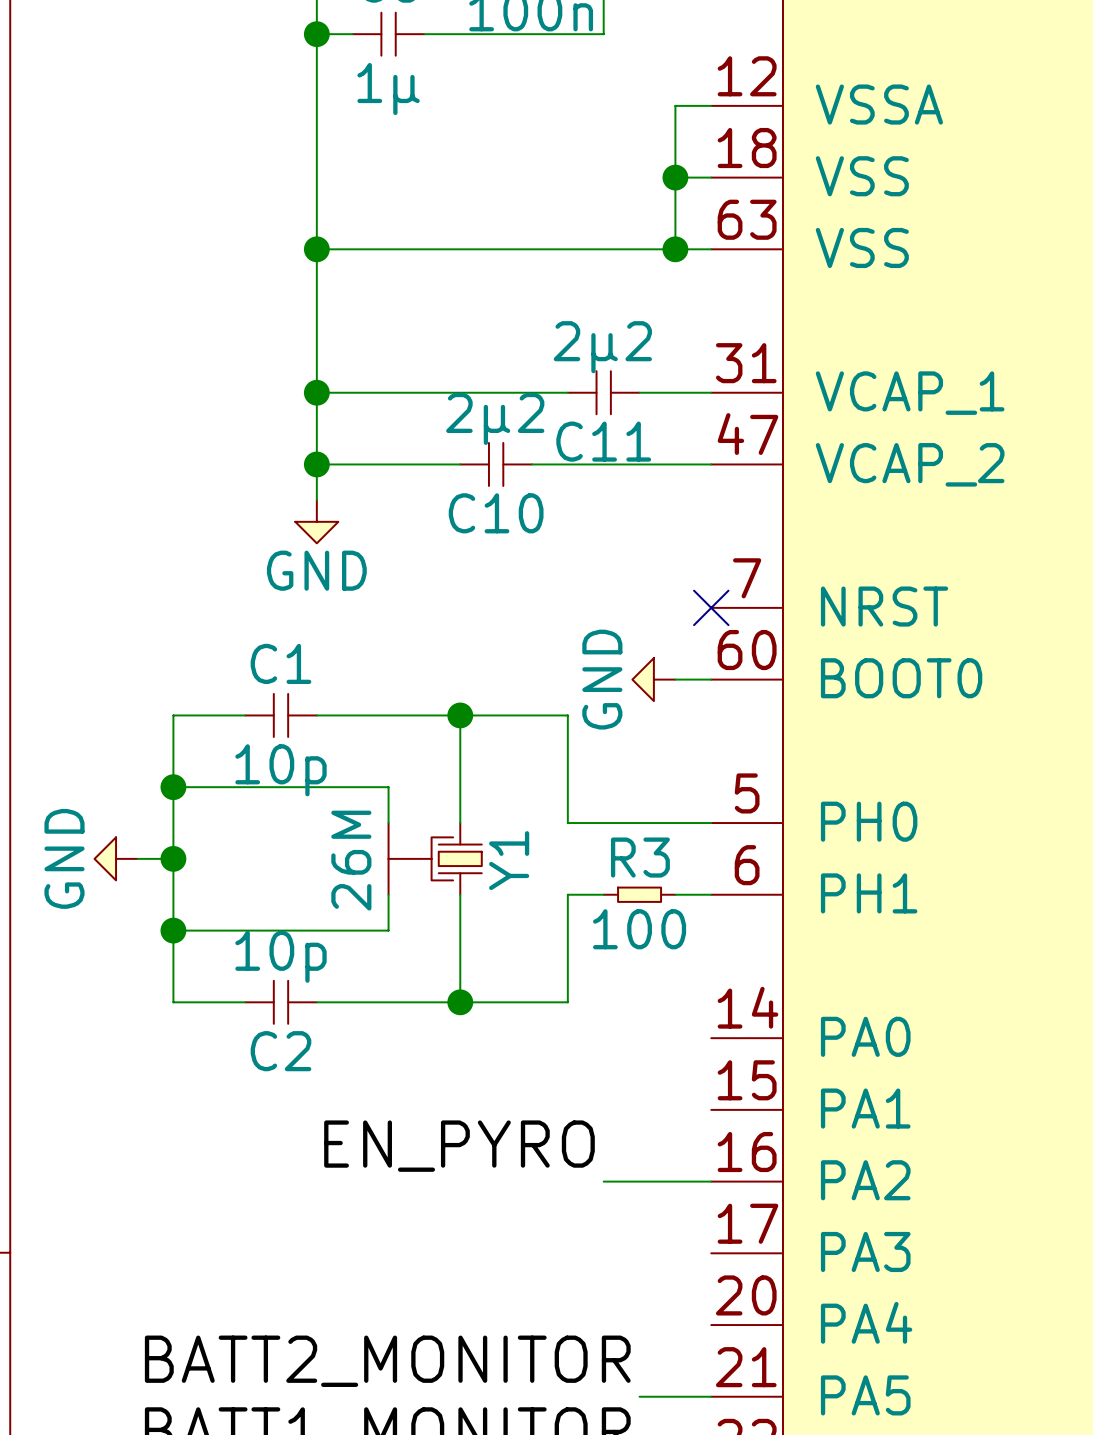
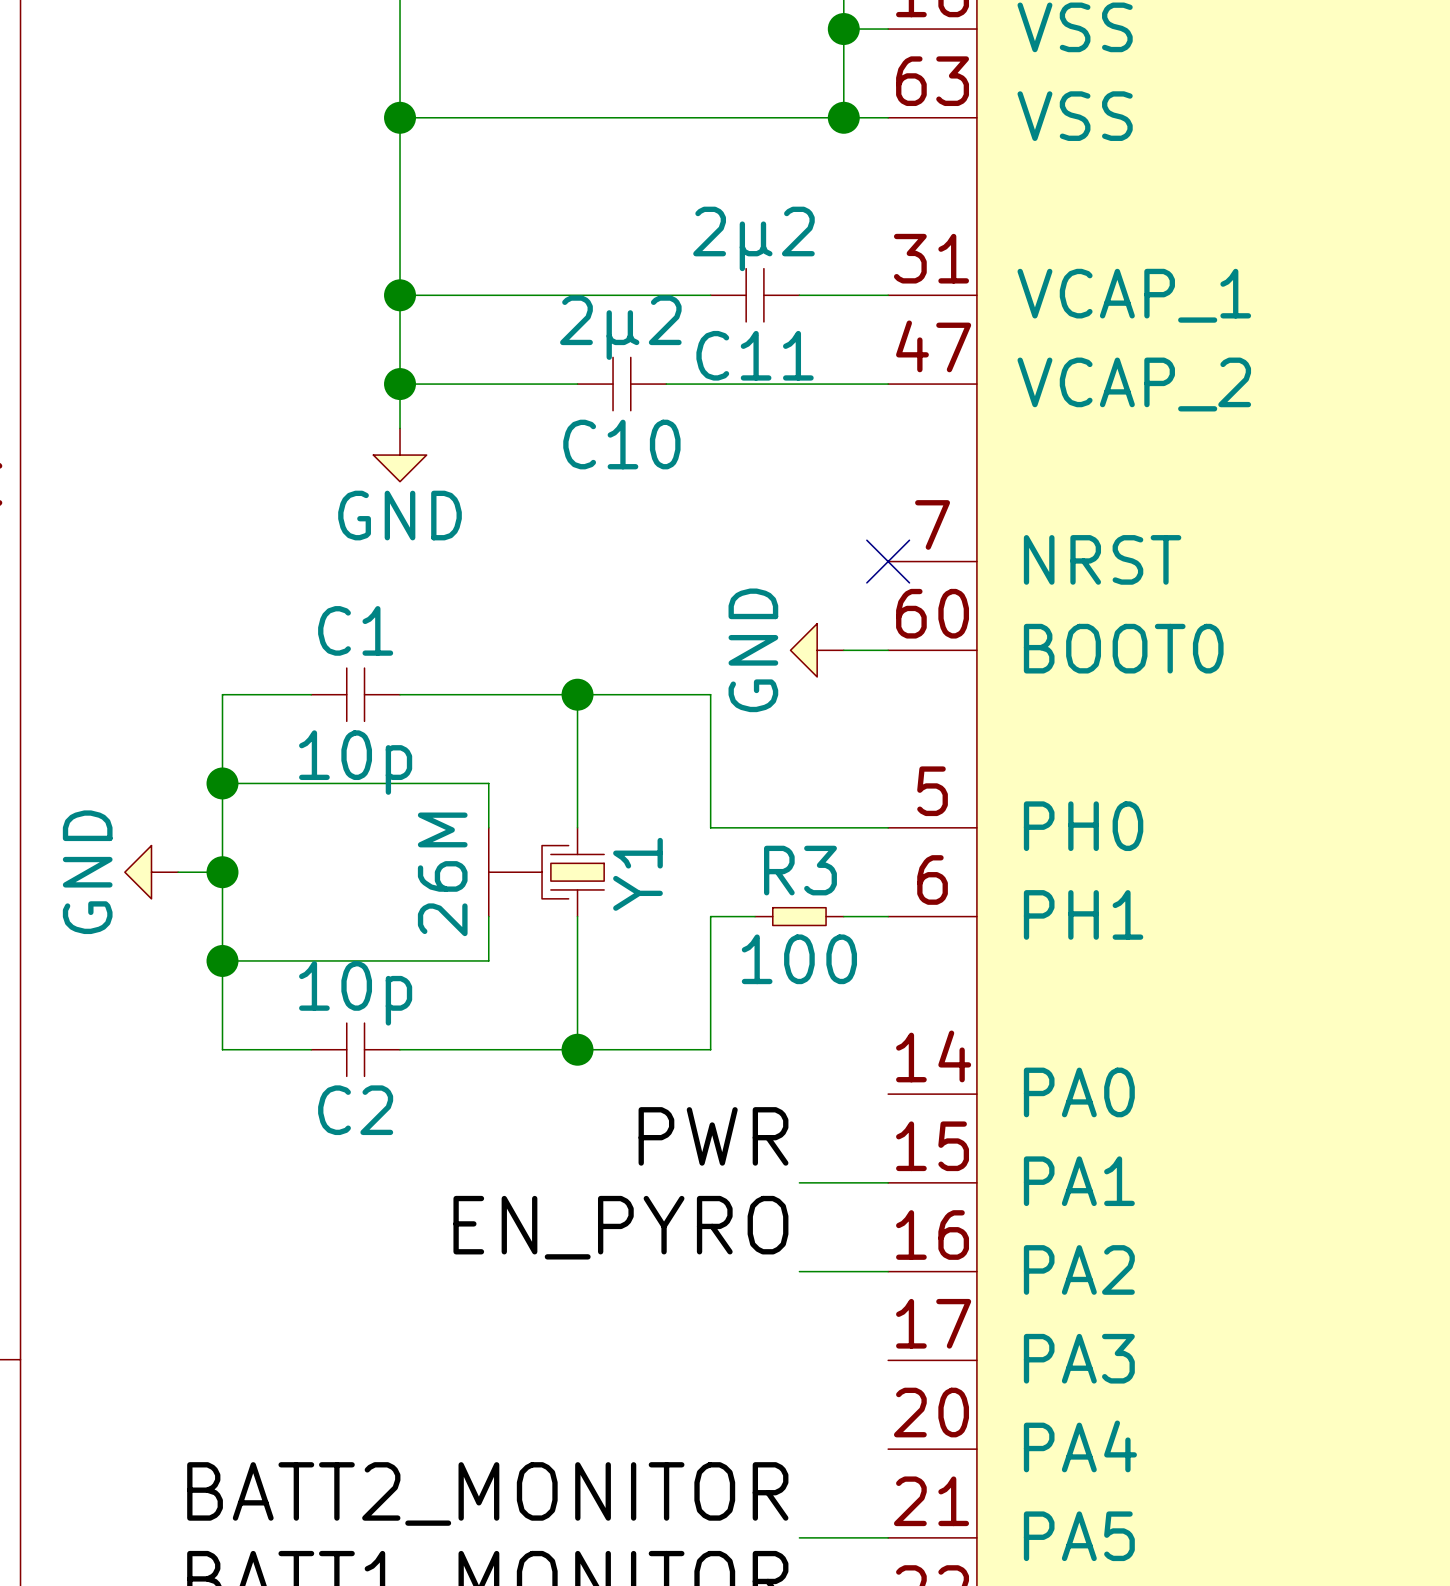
label: none -> PWR (713, 1136)
wire: none -> (799, 1182) (888, 1182)
label position: EN_PYRO (459, 1146) -> EN_PYRO (620, 1227)
wire: (603, 1181) (639, 1181) -> none

